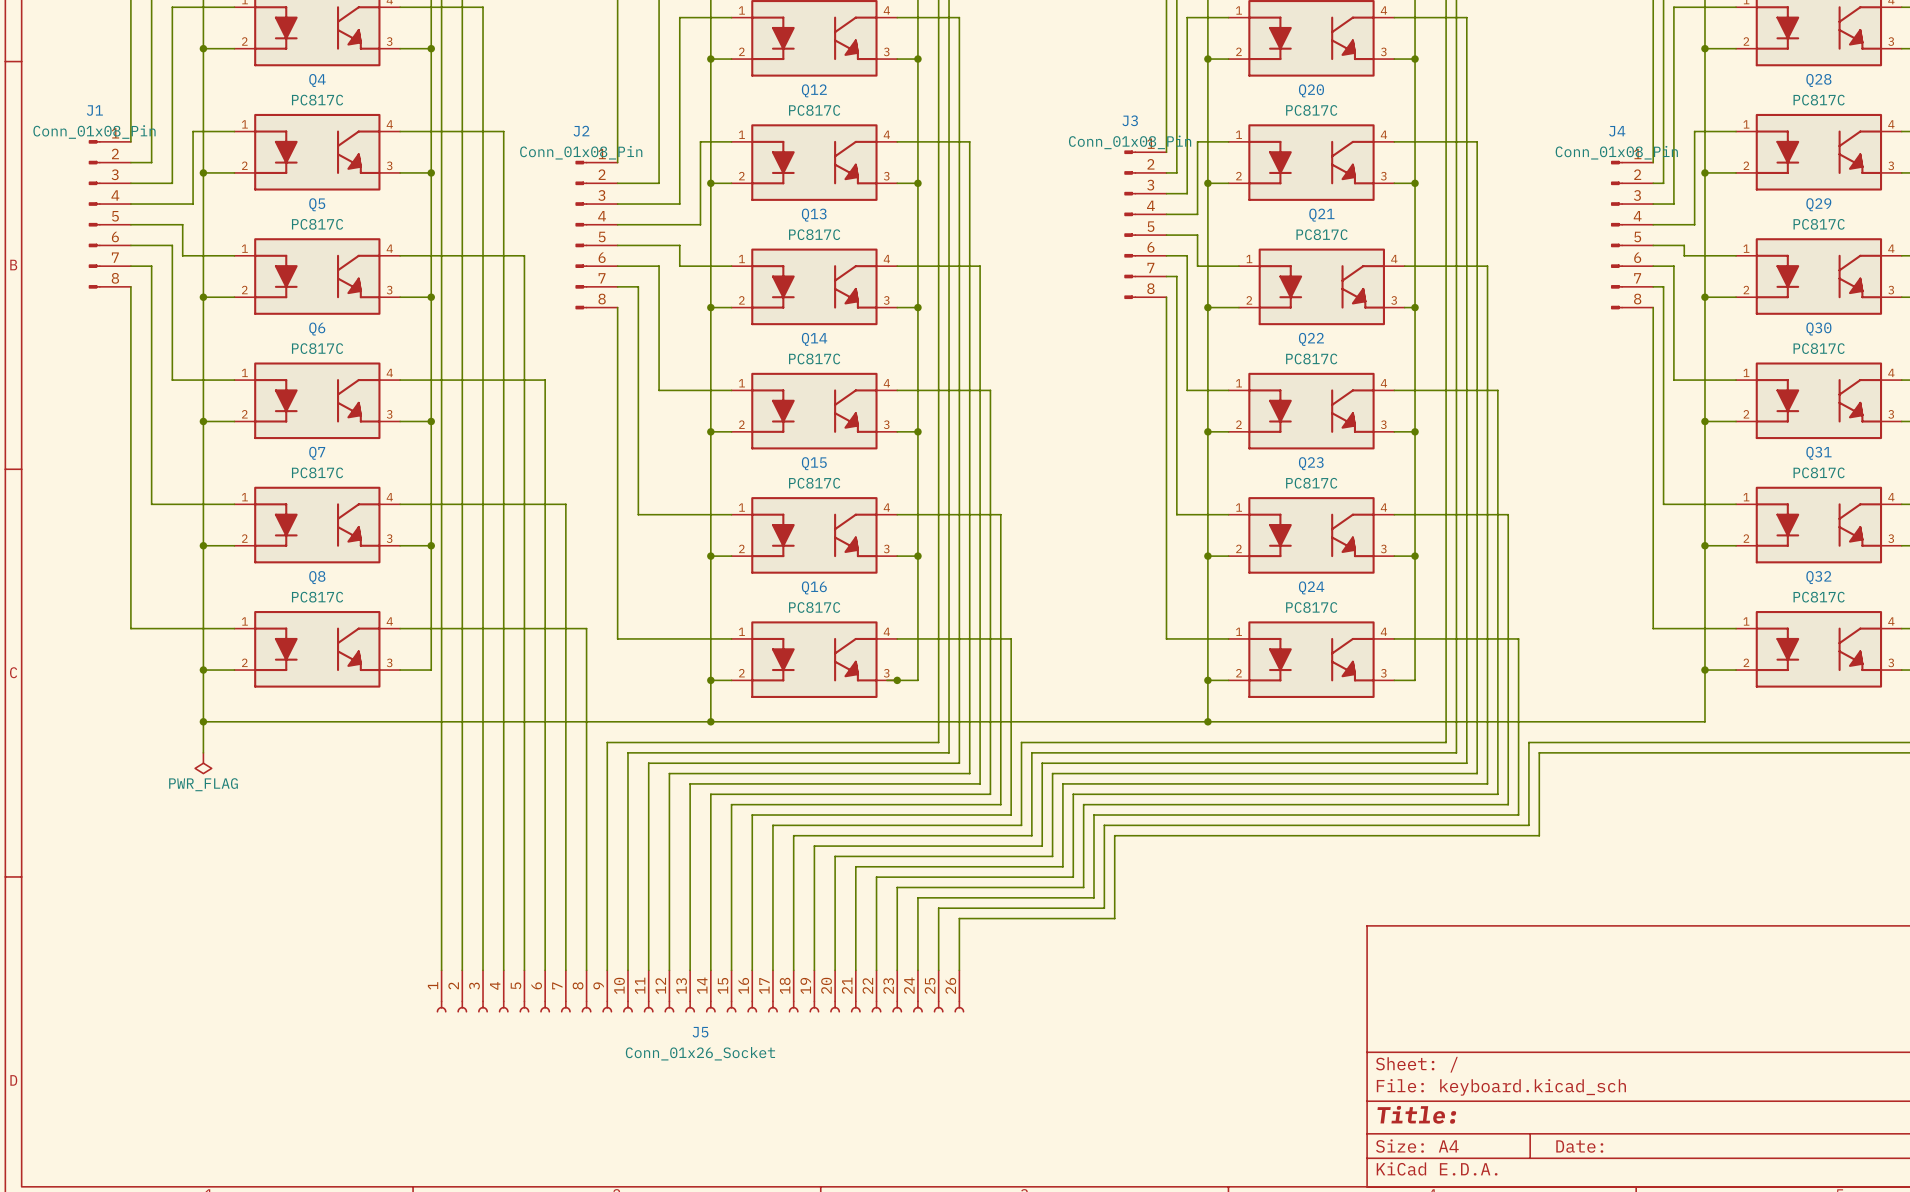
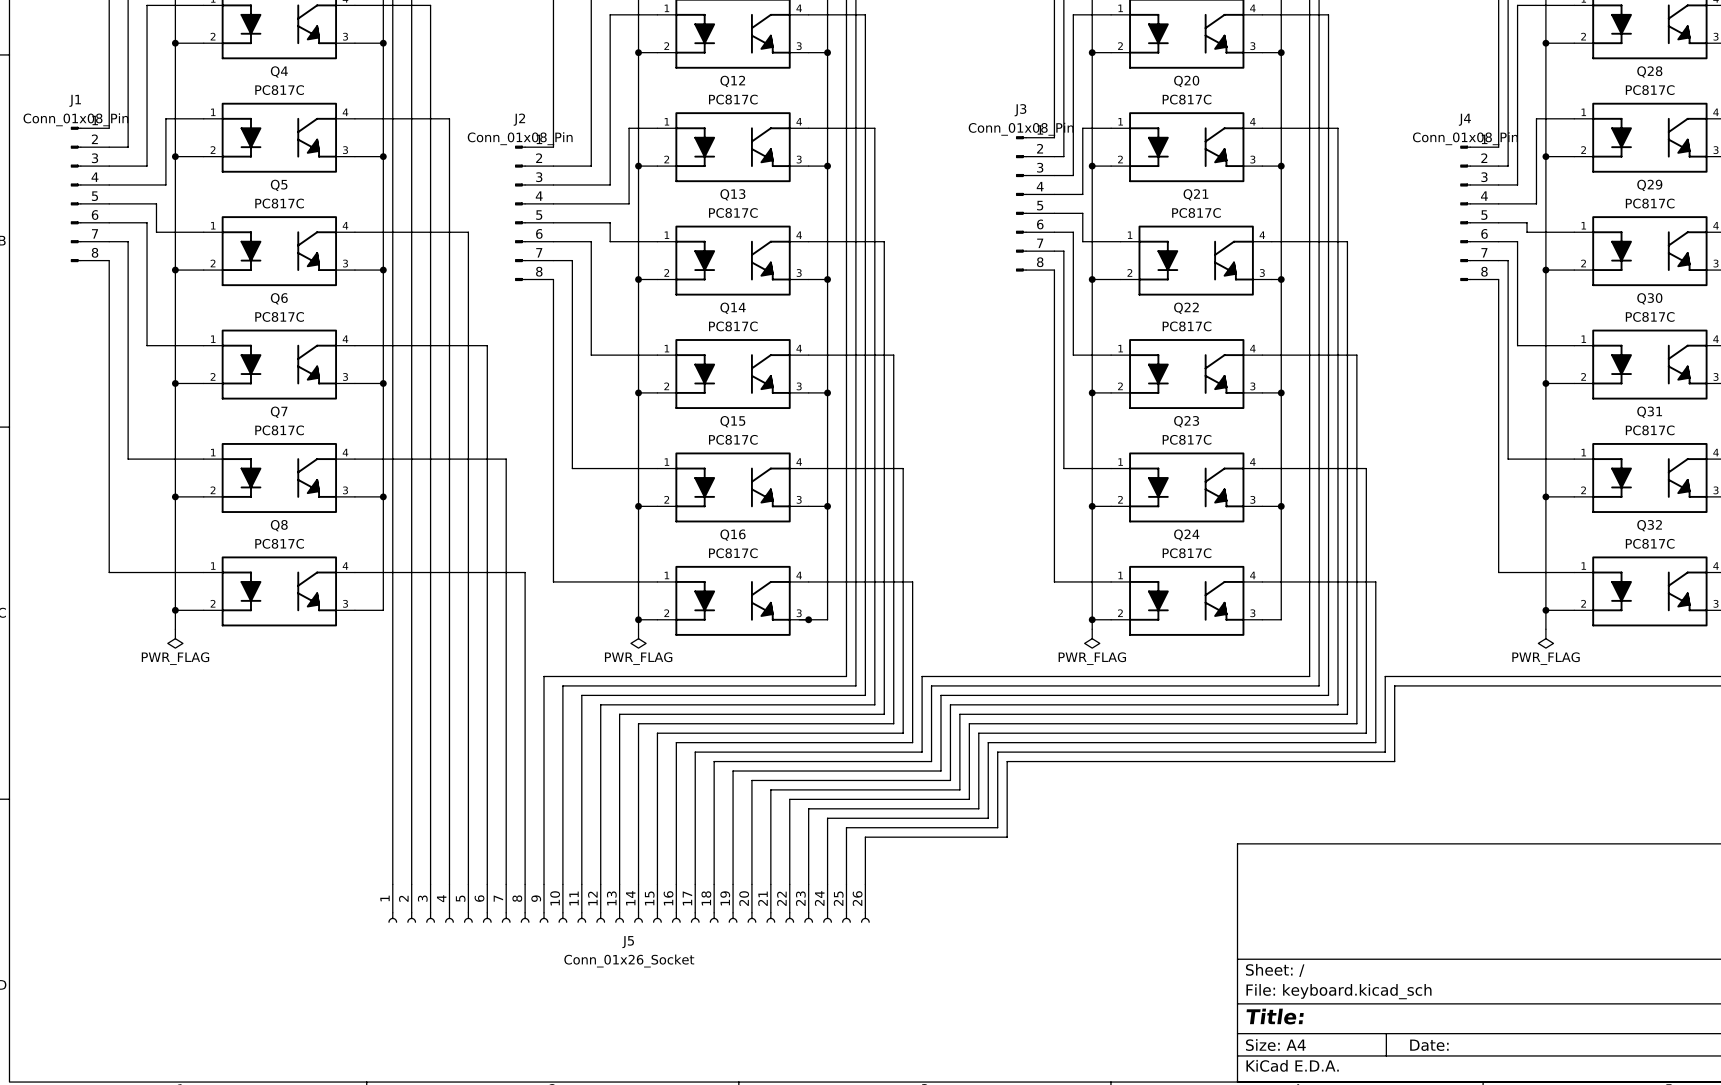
wire: (203, 690) (203, 752) -> none
wire: (710, 690) (710, 721) -> none
wire: (1207, 690) (1207, 721) -> none
wire: (1704, 690) (1704, 721) (203, 721) -> none
power symbol: none -> PWR_FLAG (638, 638)
power symbol: none -> PWR_FLAG (1092, 638)
power symbol: none -> PWR_FLAG (1545, 638)
junction: (203, 721) -> none
junction: (710, 721) -> none
junction: (1207, 721) -> none
power symbol position: PWR_FLAG (203, 763) -> PWR_FLAG (175, 638)

